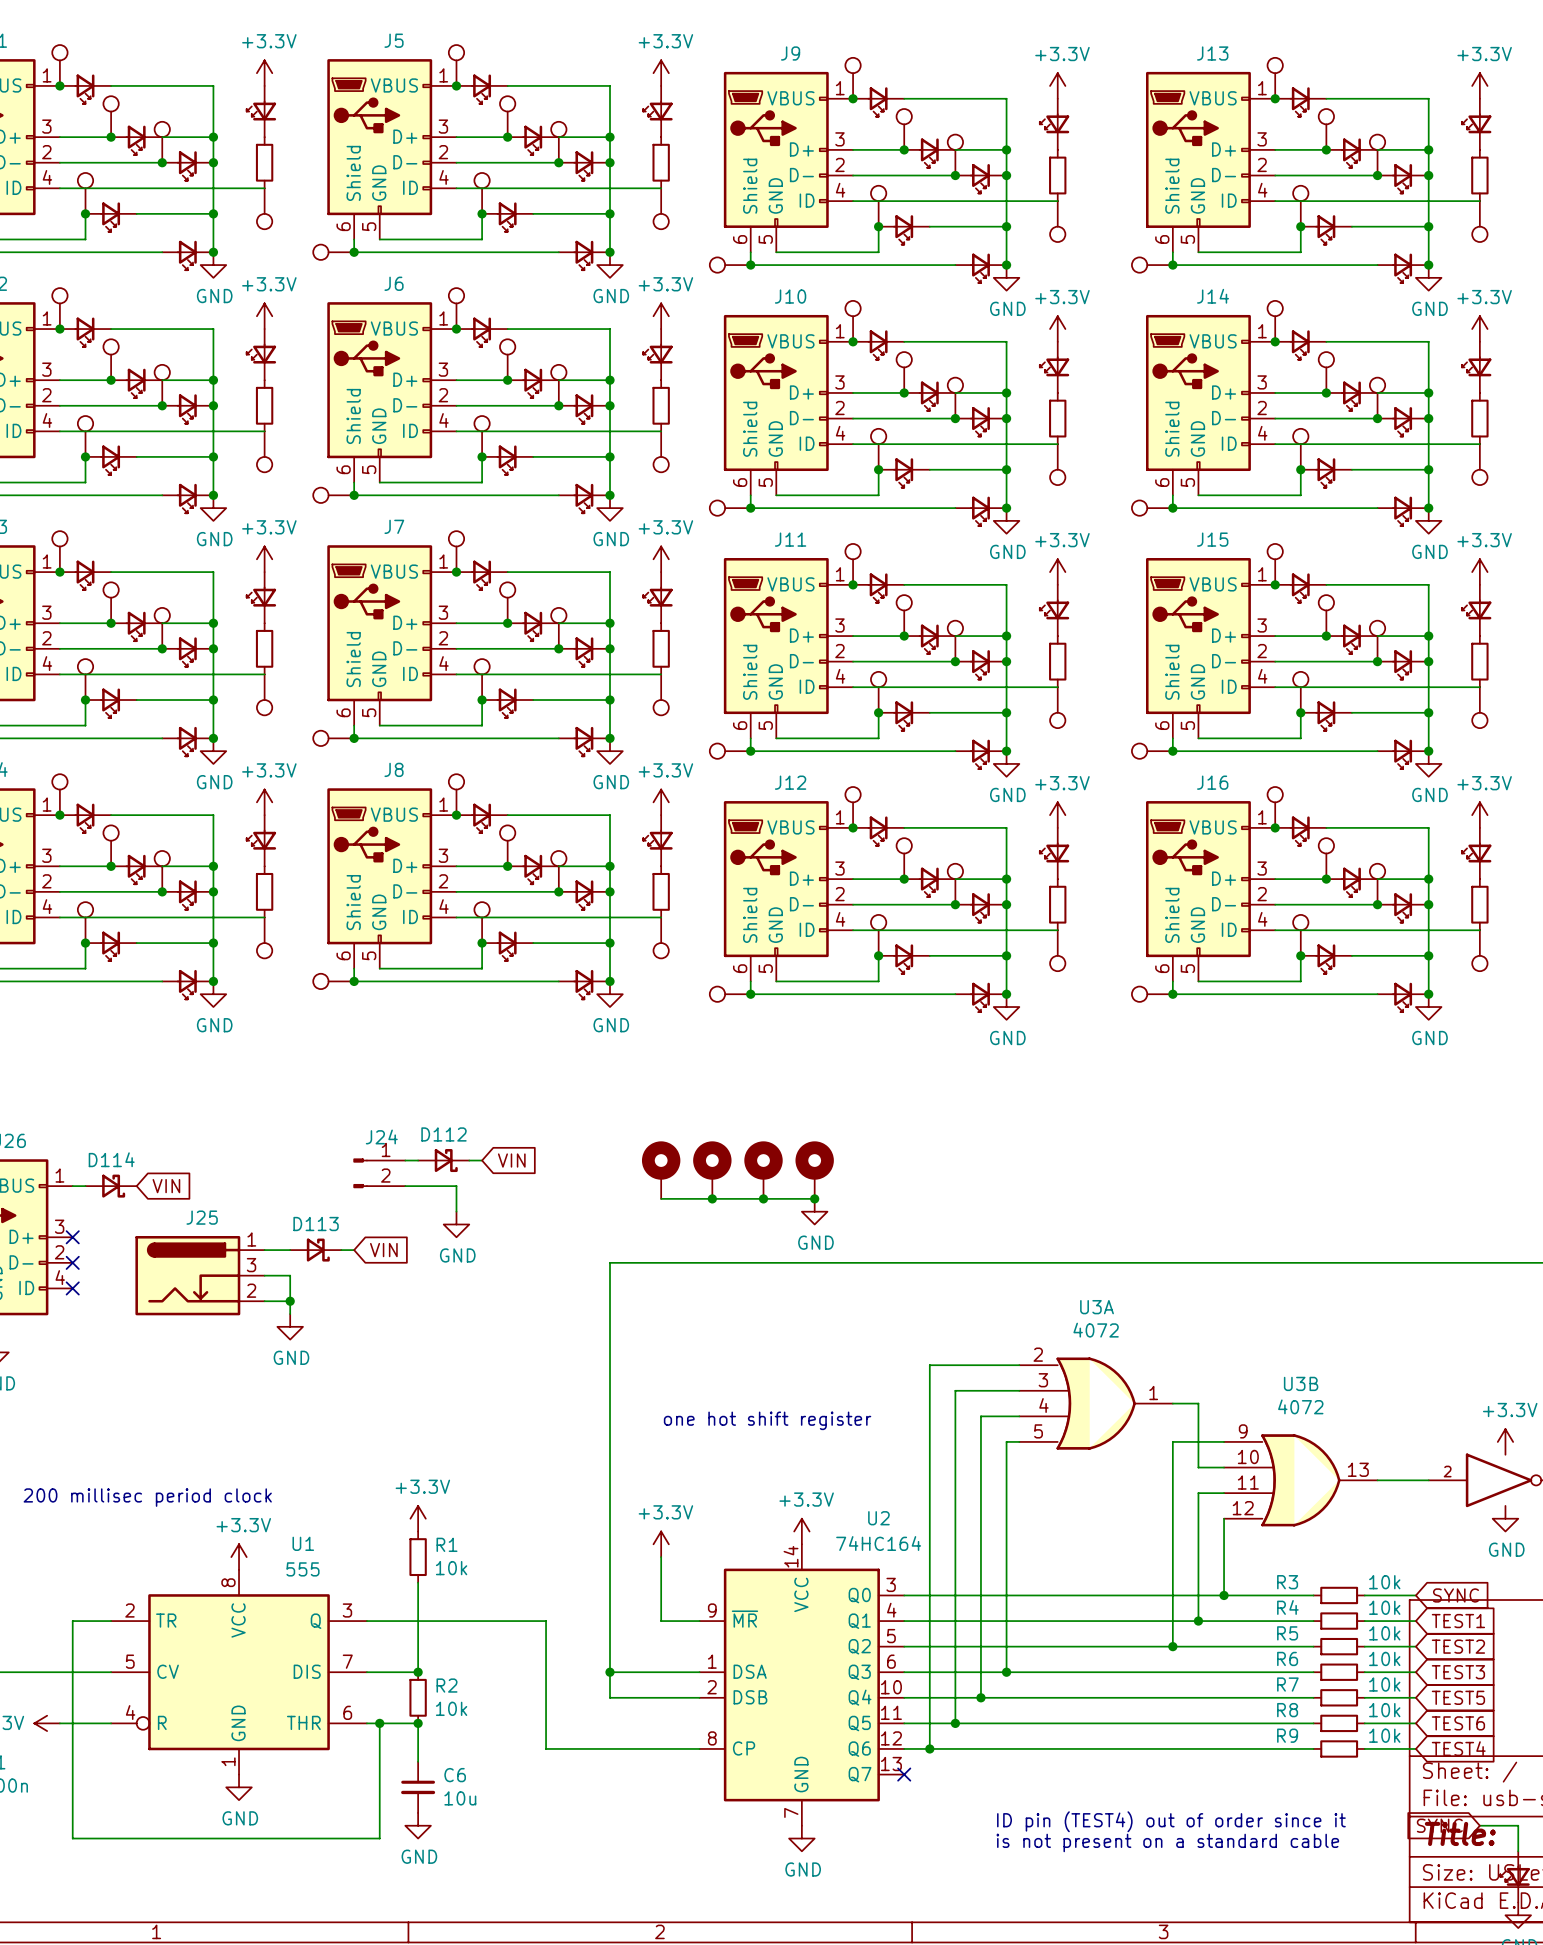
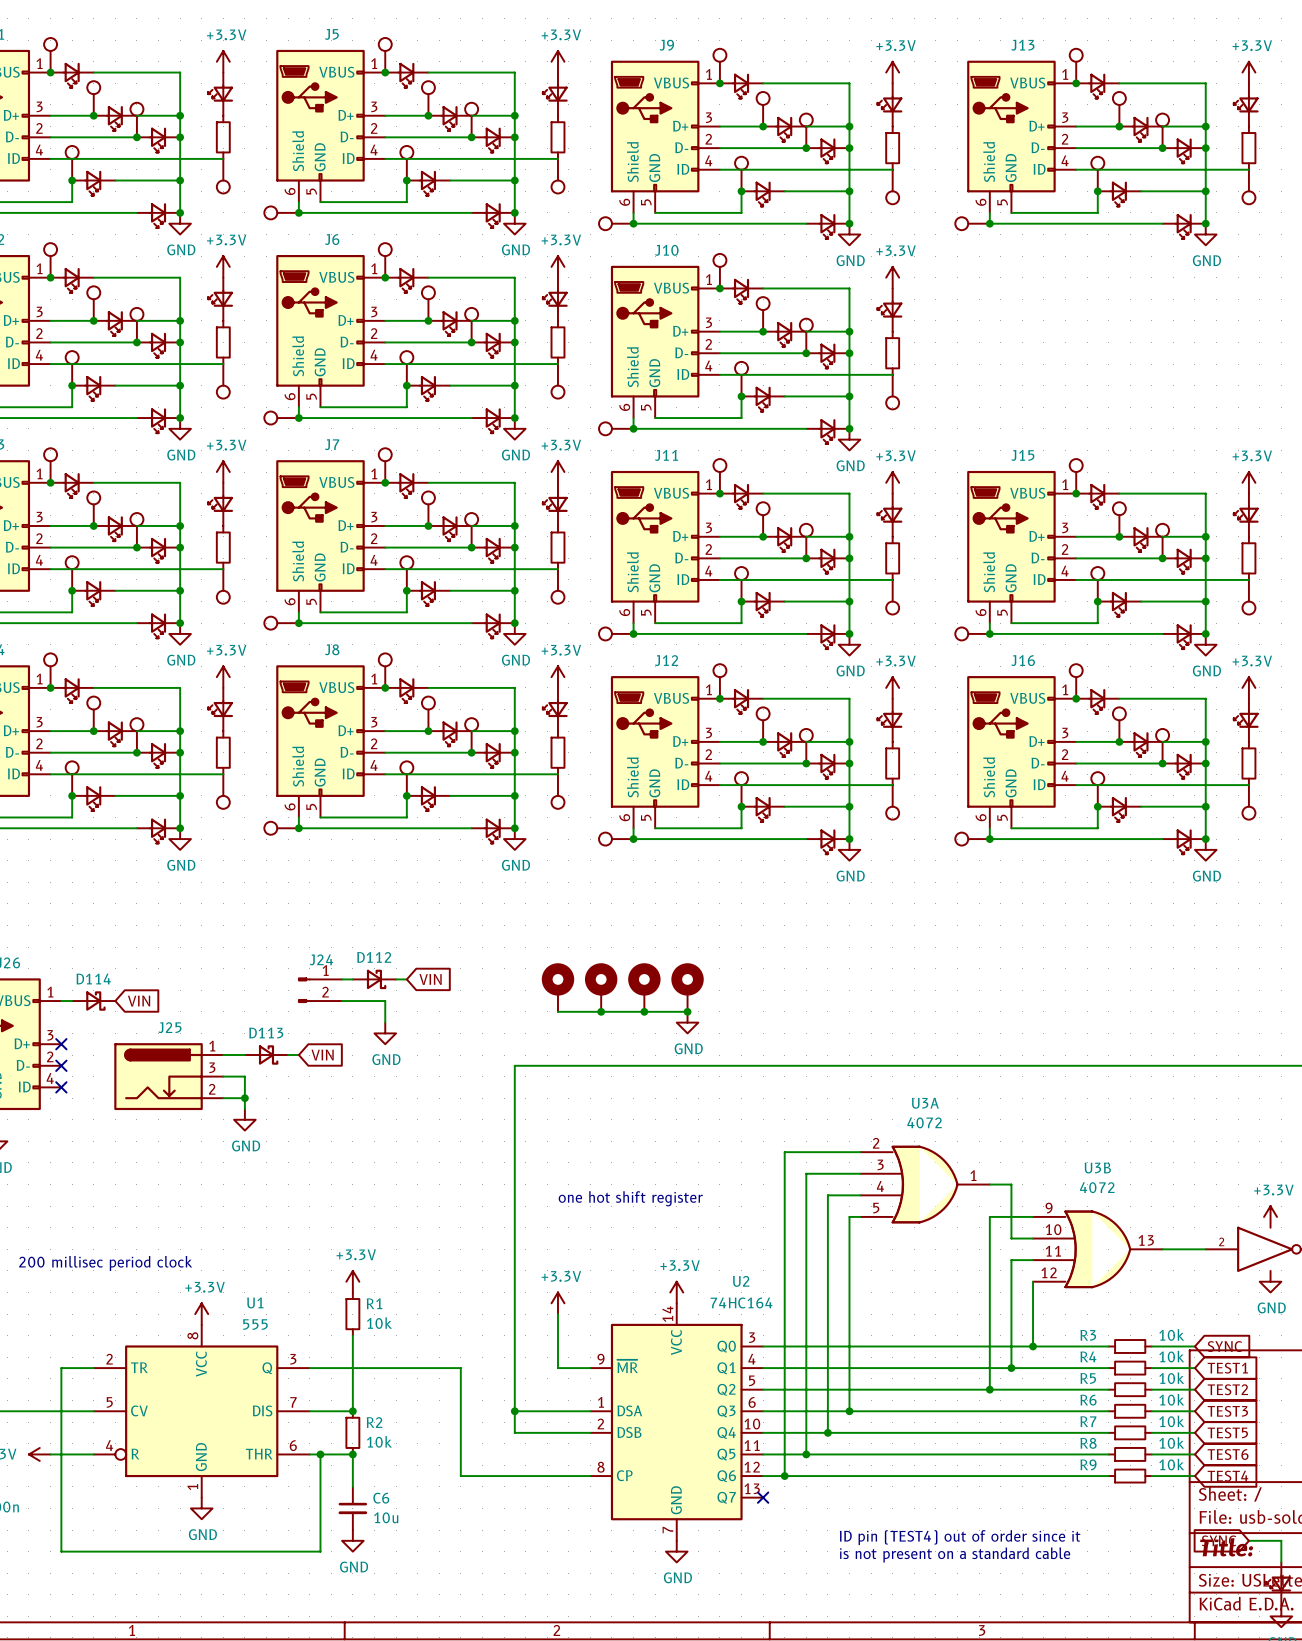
part: (1275, 321) -> none
power symbol: +3.3V (1479, 329) -> none
junction: (1275, 341) -> none
wire: (1326, 341) (1428, 341) (1428, 508) -> none
part: (1300, 345) -> none
part: (1476, 367) -> none
part: (1326, 372) -> none
wire: (1275, 392) (1326, 392) -> none
junction: (1326, 392) -> none
wire: (1377, 392) (1428, 392) -> none
junction: (1428, 392) -> none
part: (1351, 396) -> none
part: (1377, 398) -> none
J14: (1210, 405) -> none
wire: (1275, 418) (1377, 418) -> none
junction: (1377, 418) -> none
junction: (1428, 418) -> none
part: (1479, 418) -> none
part: (1403, 421) -> none
wire: (1275, 444) (1479, 444) -> none
part: (1300, 449) -> none
part: (1479, 464) -> none
wire: (1300, 469) (1300, 495) (1198, 495) -> none
junction: (1300, 469) -> none
wire: (1351, 469) (1428, 469) -> none
junction: (1428, 469) -> none
part: (1326, 472) -> none
wire: (1172, 495) (1172, 508) (1377, 508) -> none
part: (1152, 508) -> none
junction: (1172, 508) -> none
junction: (1428, 508) -> none
part: (1403, 511) -> none
power symbol: GND (1428, 520) -> none

